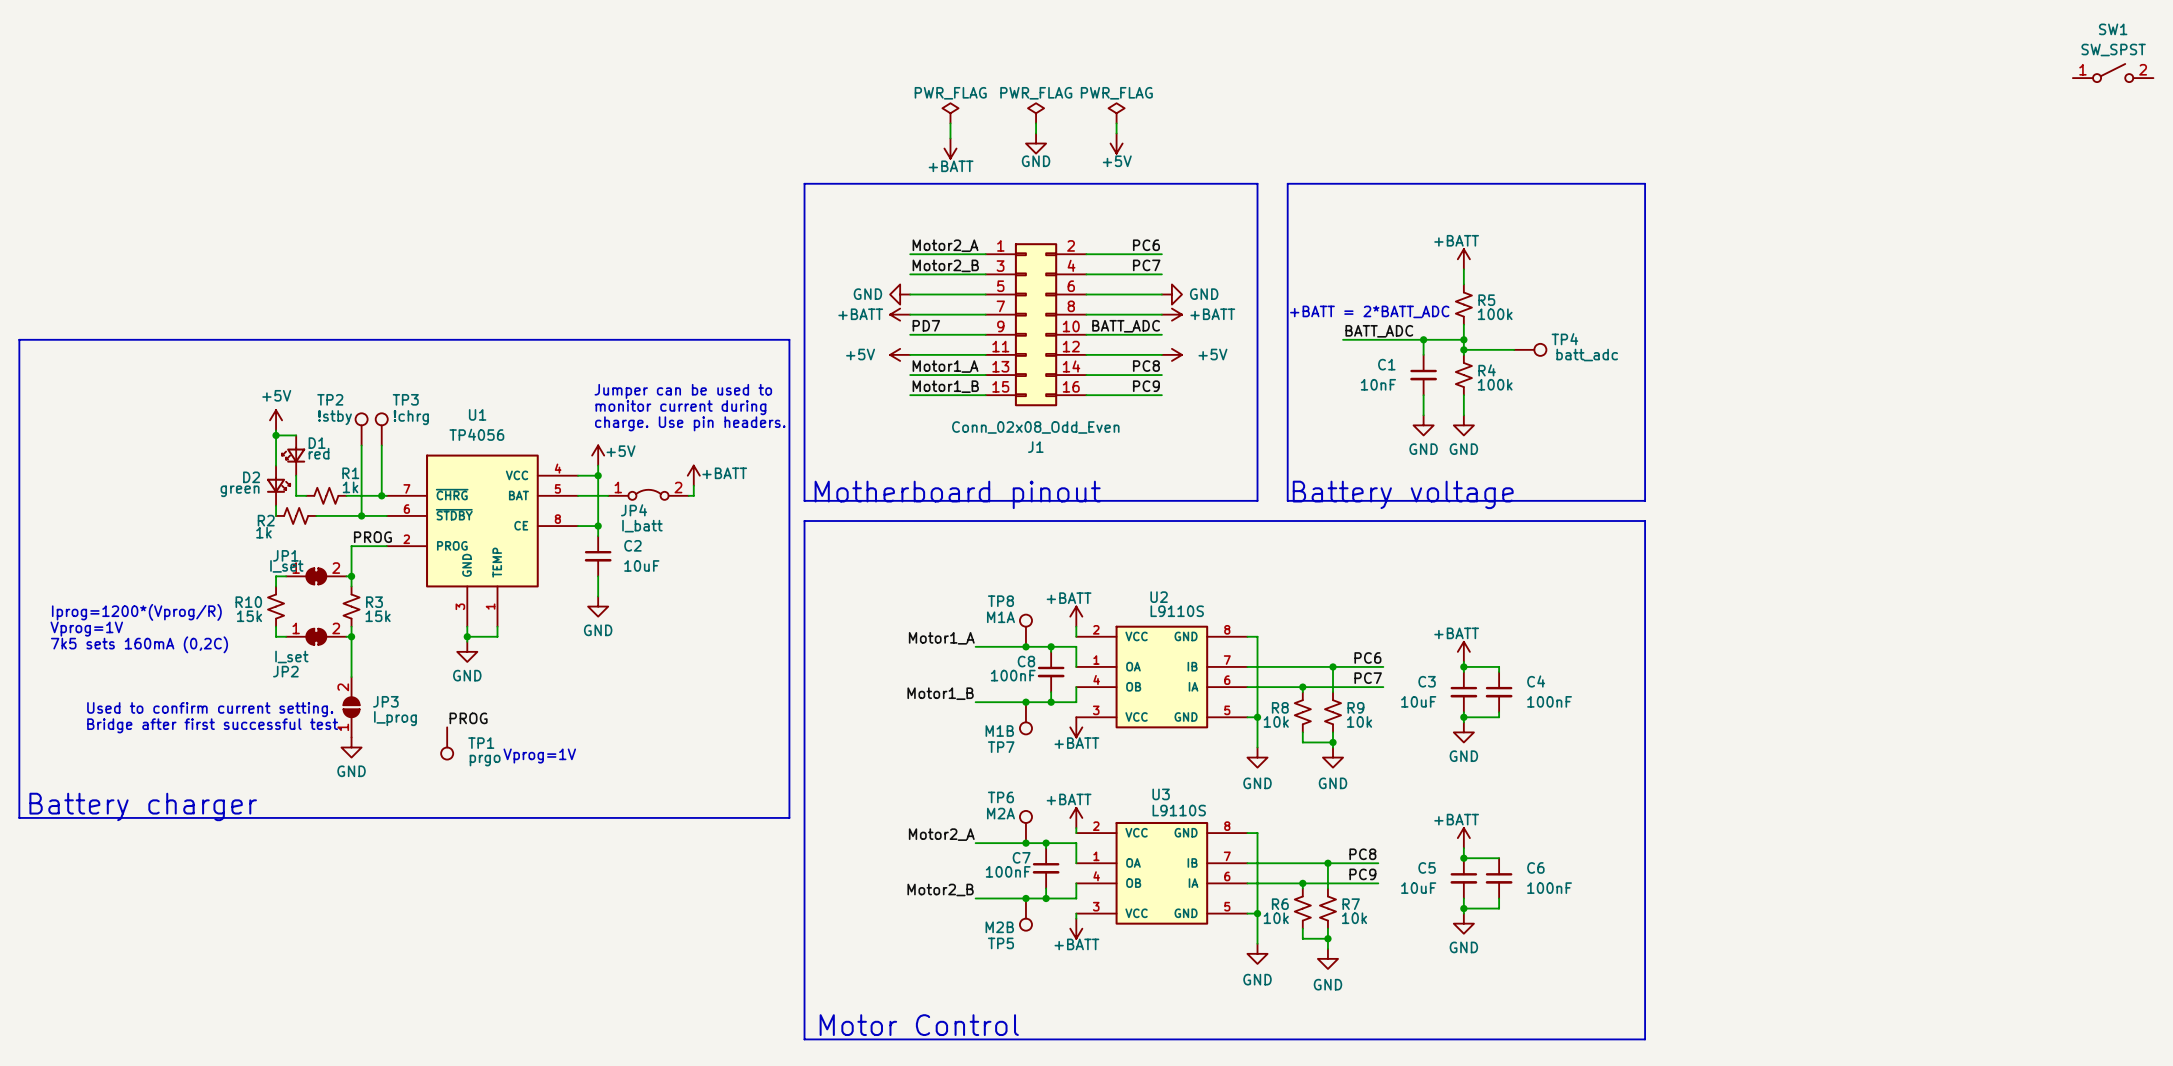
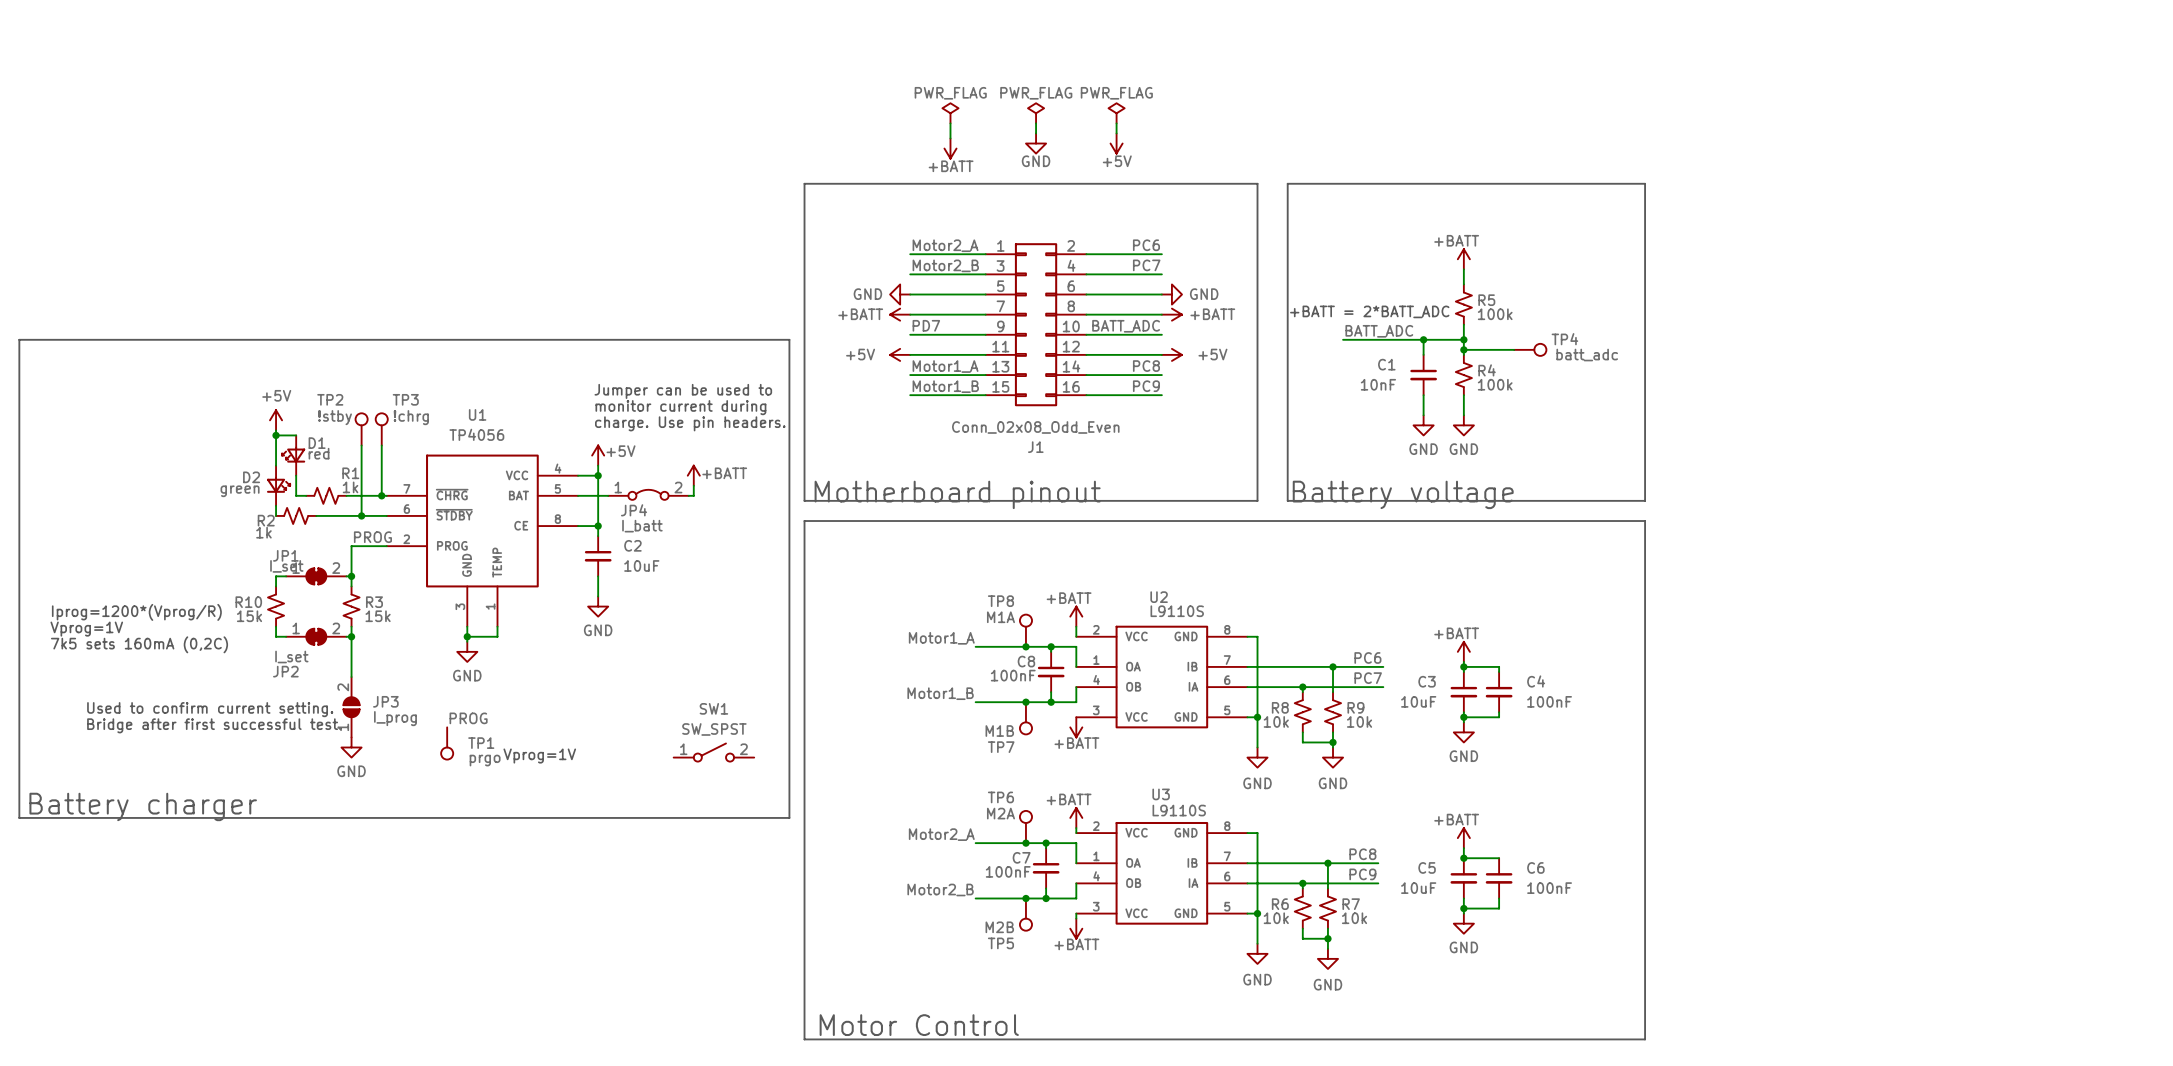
SW1 position: (2113, 73) -> (713, 752)

